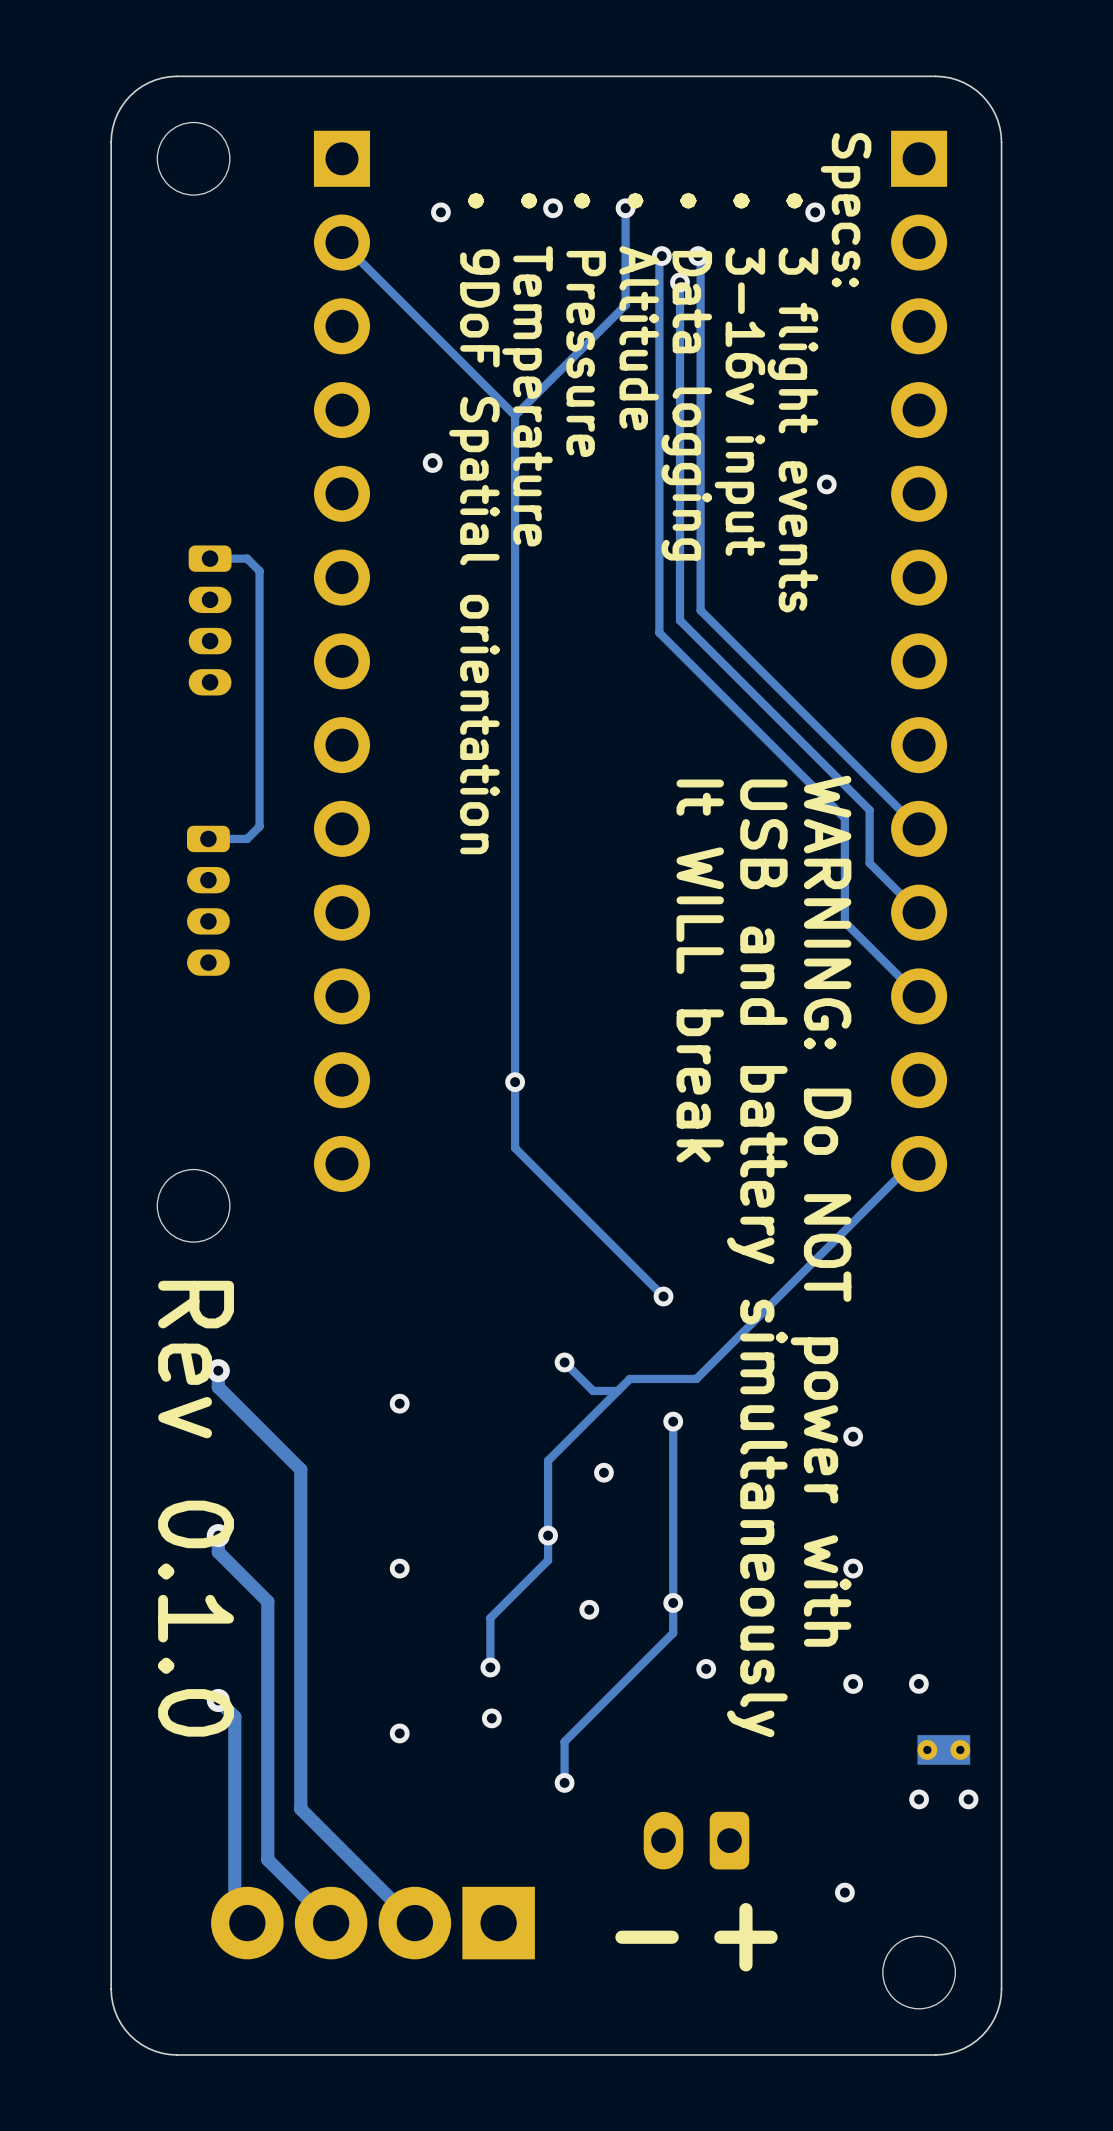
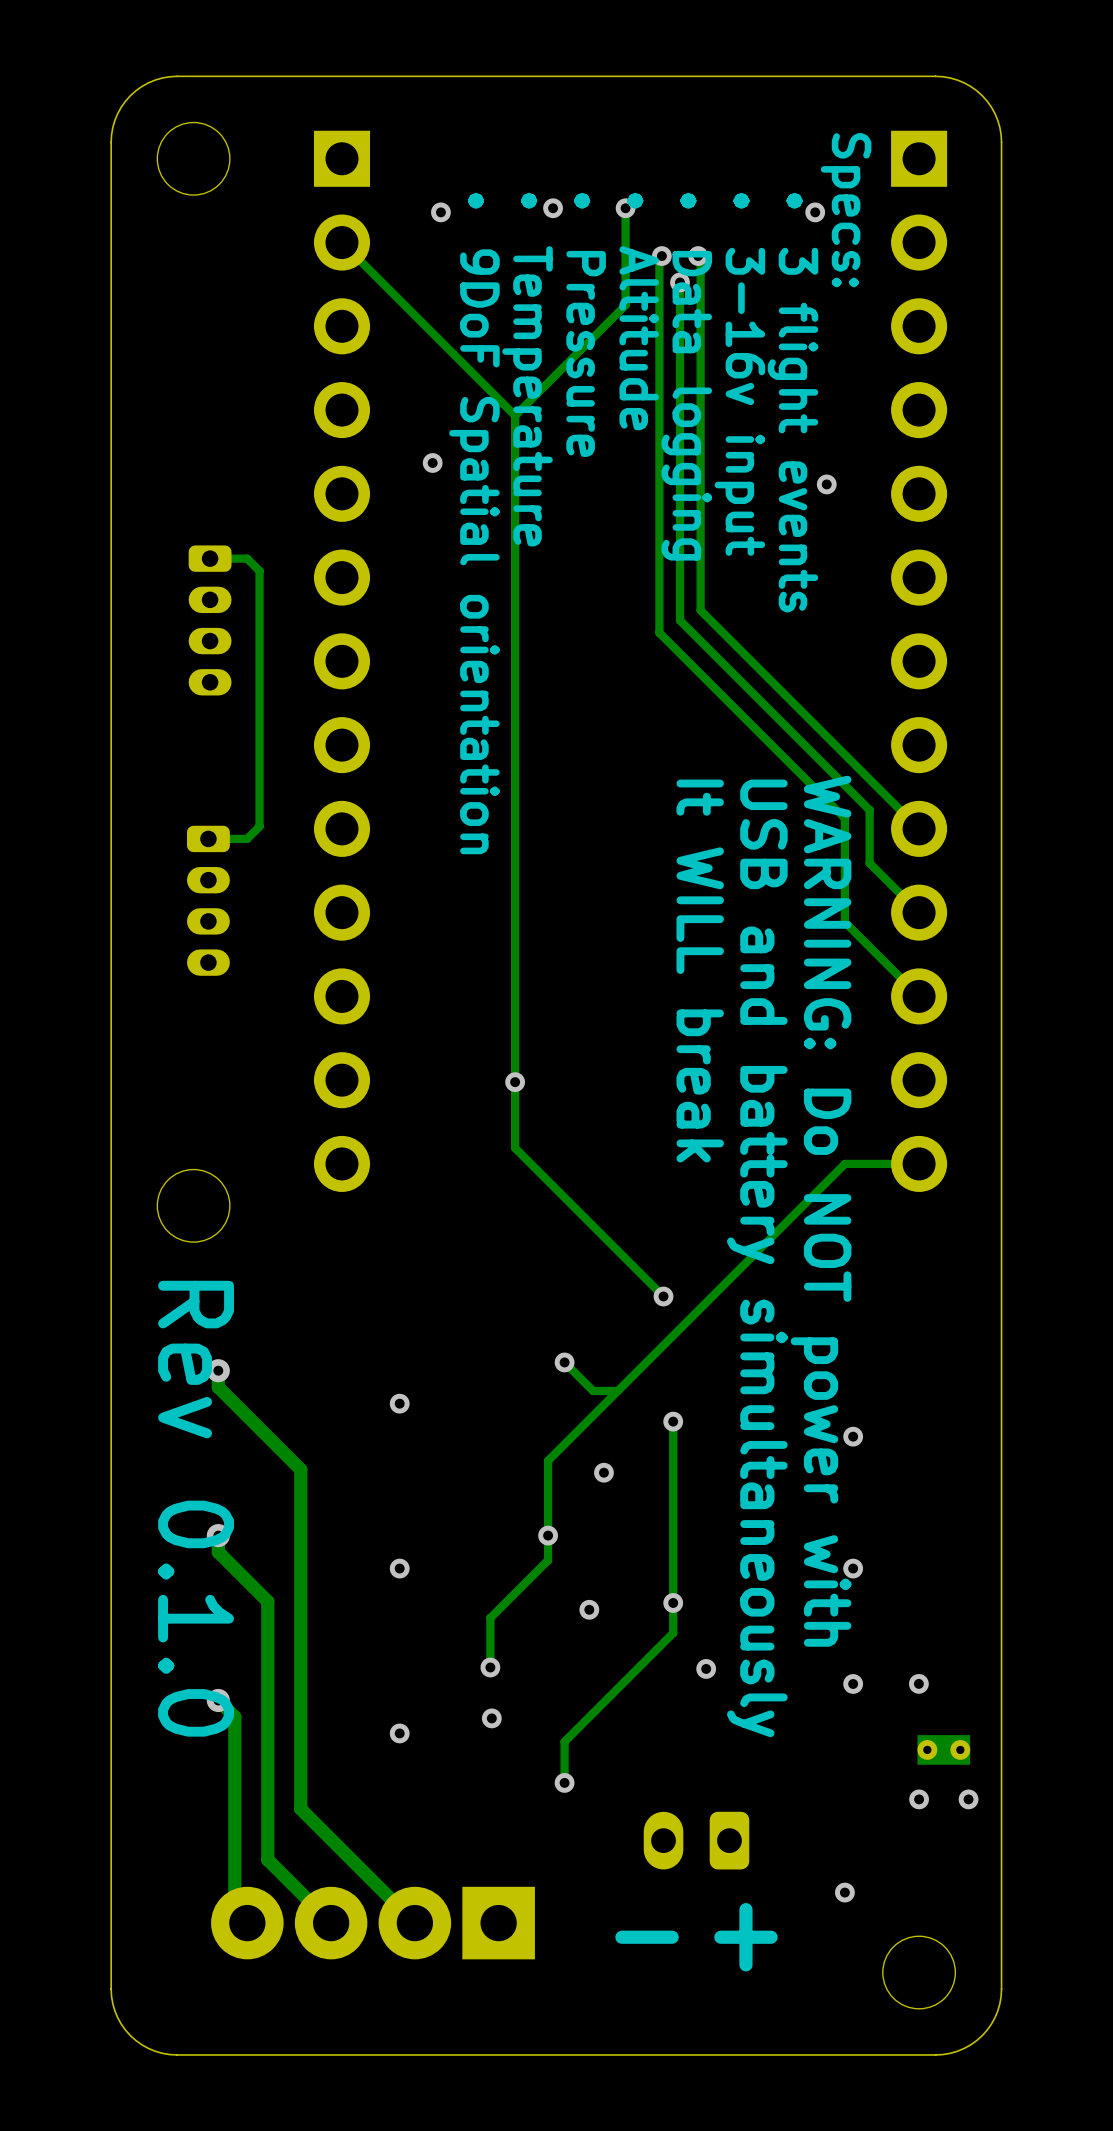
track: (911, 1163) (696, 1378) (629, 1378) -> (911, 1163) (844, 1163) (629, 1378)

